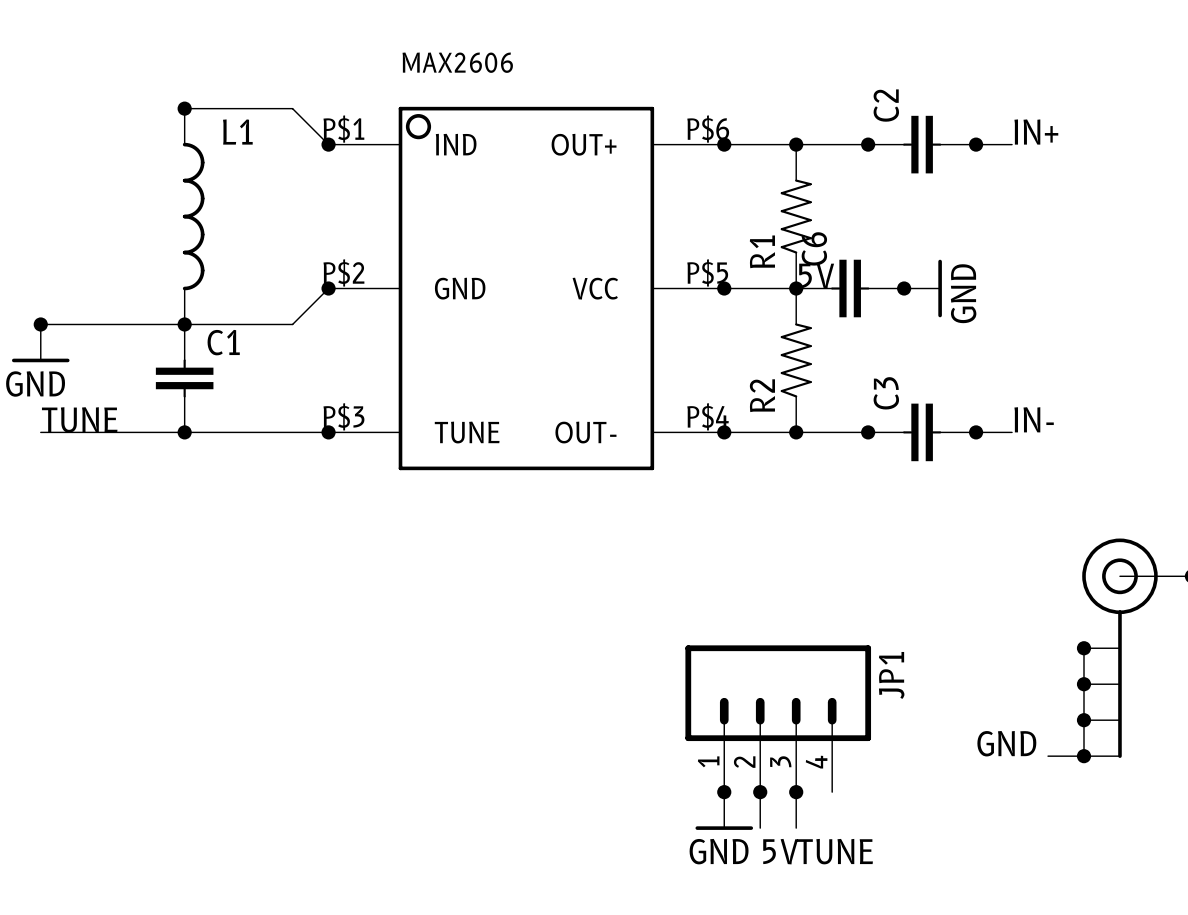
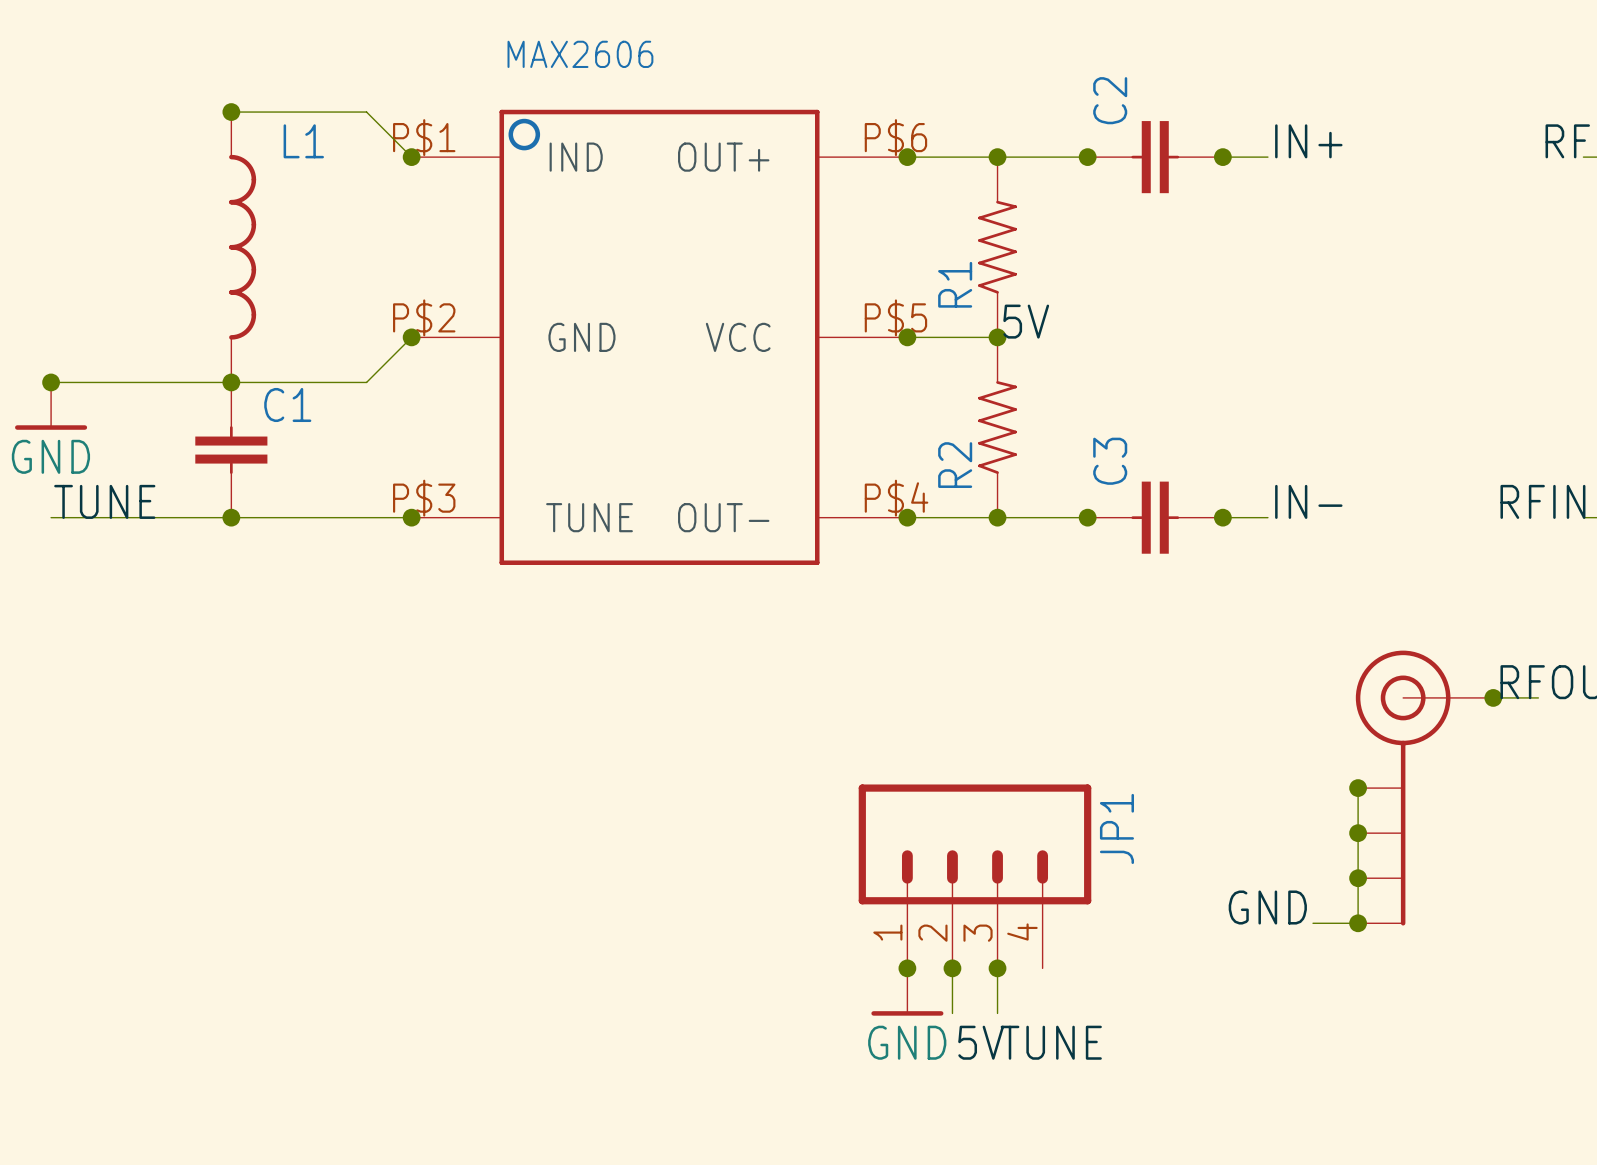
C6: (850, 288) -> none
junction: (904, 288) -> none
power symbol: GND (923, 288) -> none

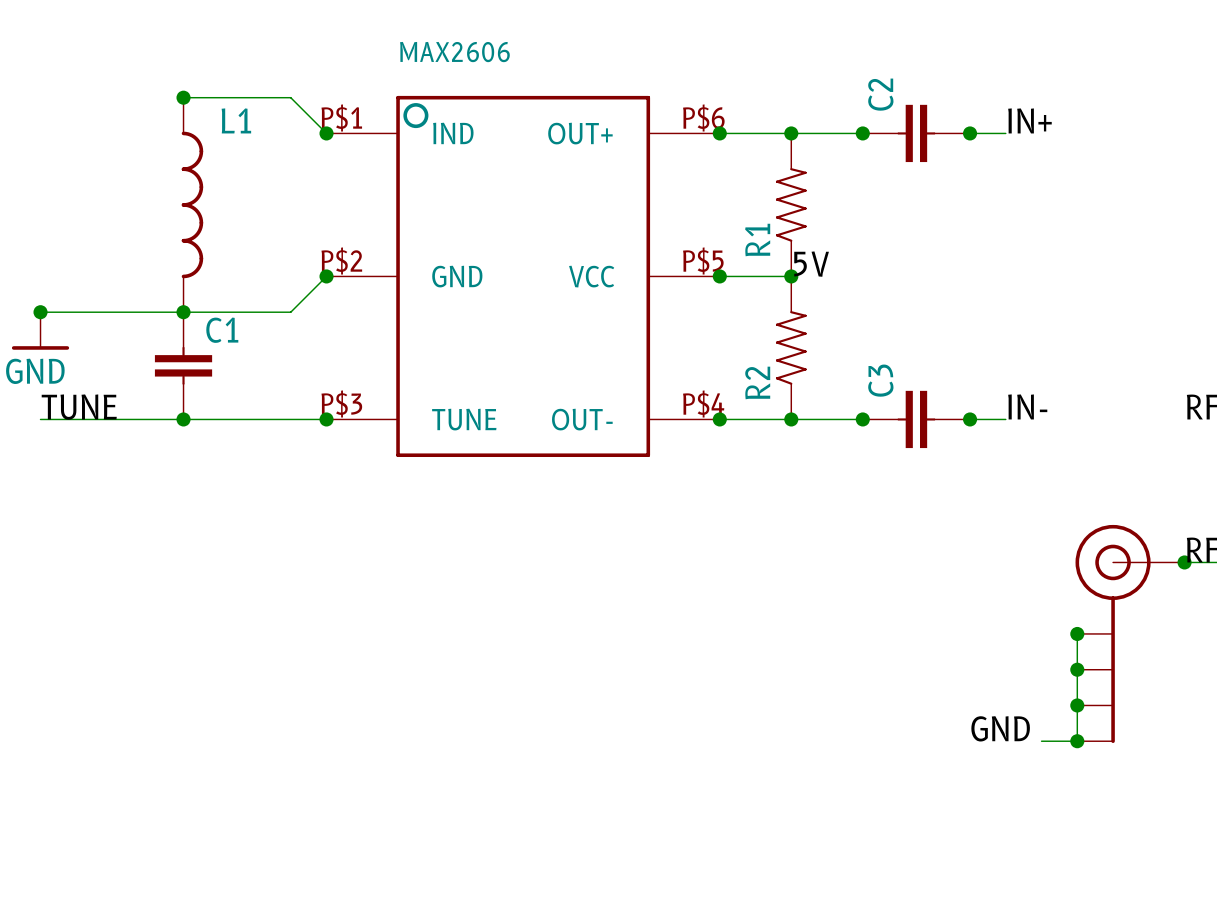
JP1: (974, 876) -> none
junction: (907, 968) -> none
wire: (952, 968) (952, 1013) -> none
junction: (952, 968) -> none
wire: (997, 968) (997, 1013) -> none
junction: (997, 968) -> none
power symbol: GND (907, 992) -> none
label: 5V (981, 1042) -> none
label: TUNE (1051, 1042) -> none

